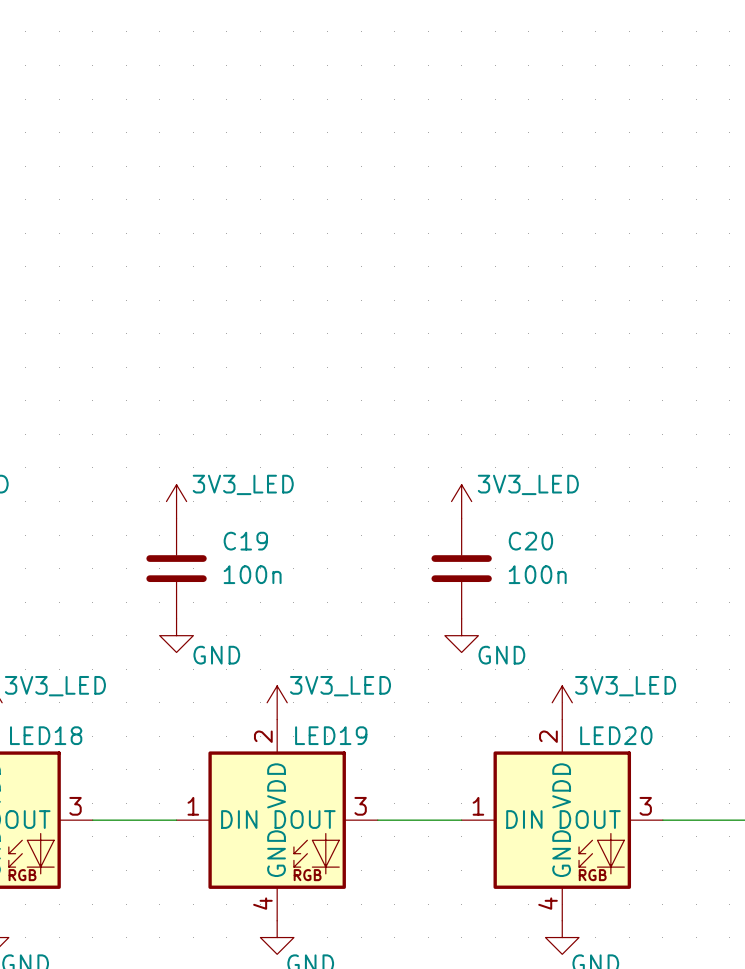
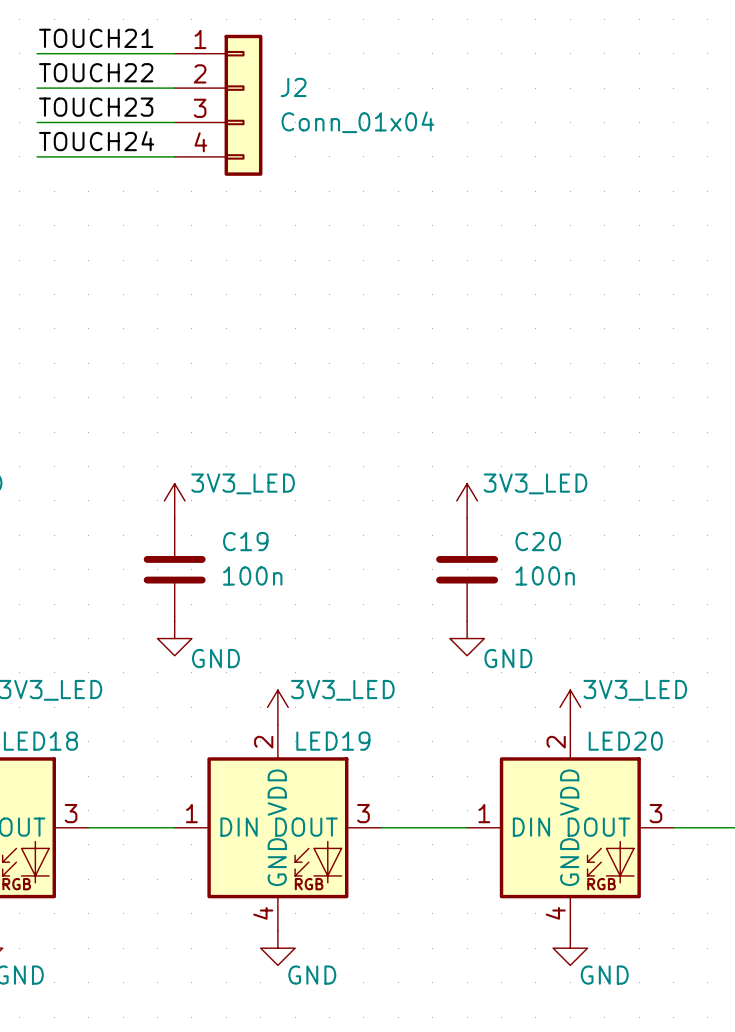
label: none -> TOUCH21 (96, 38)
wire: none -> (37, 53) (174, 53)
label: none -> TOUCH22 (96, 72)
wire: none -> (37, 88) (174, 88)
J2: none -> Conn_01x04 (218, 105)
label: none -> TOUCH23 (96, 107)
wire: none -> (37, 122) (174, 122)
label: none -> TOUCH24 (96, 141)
wire: none -> (37, 156) (174, 156)

